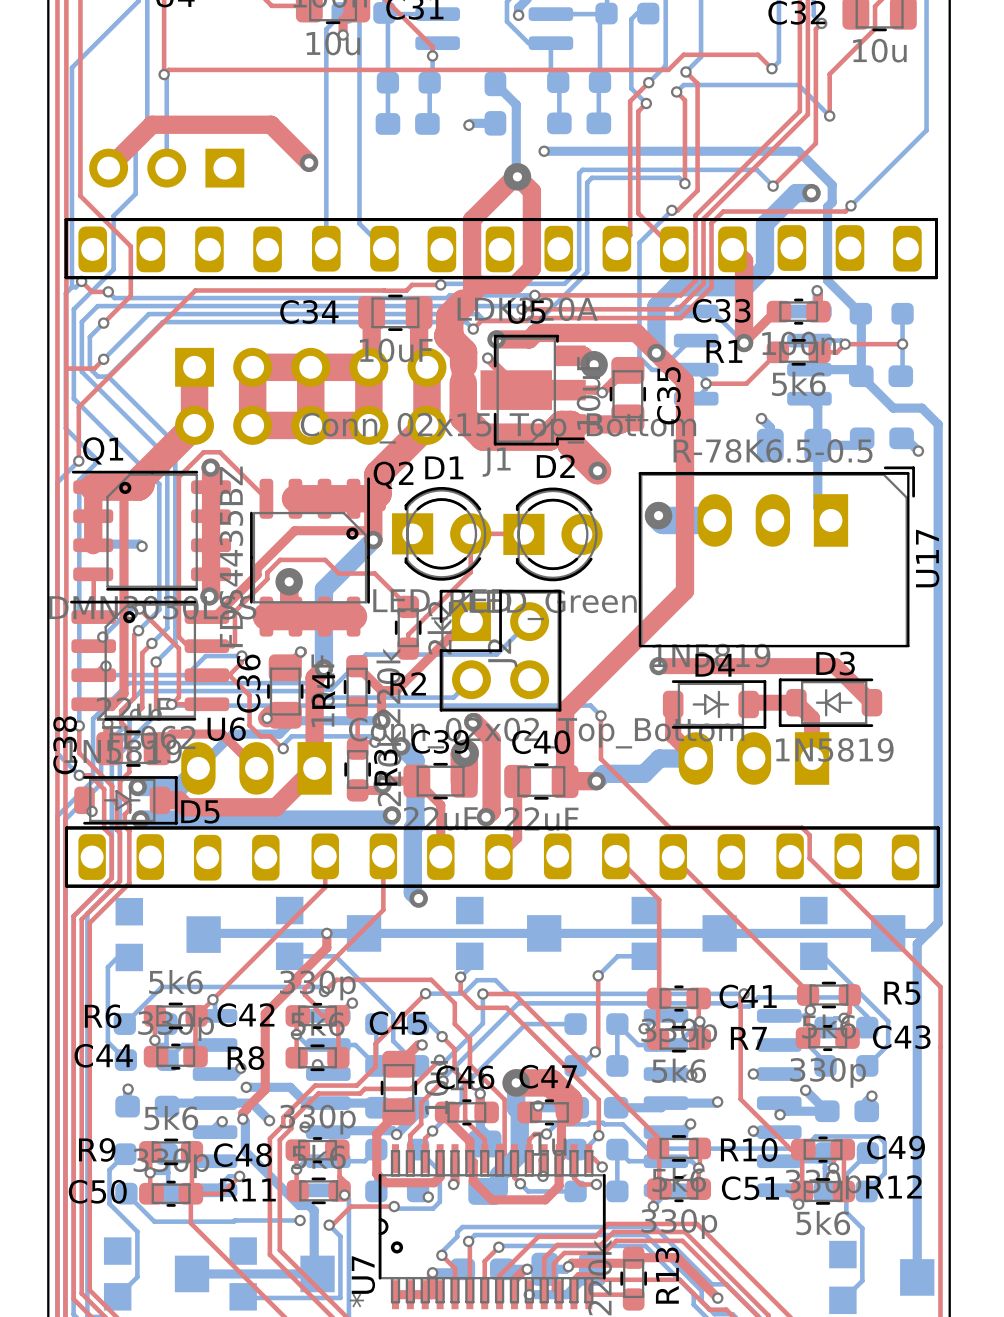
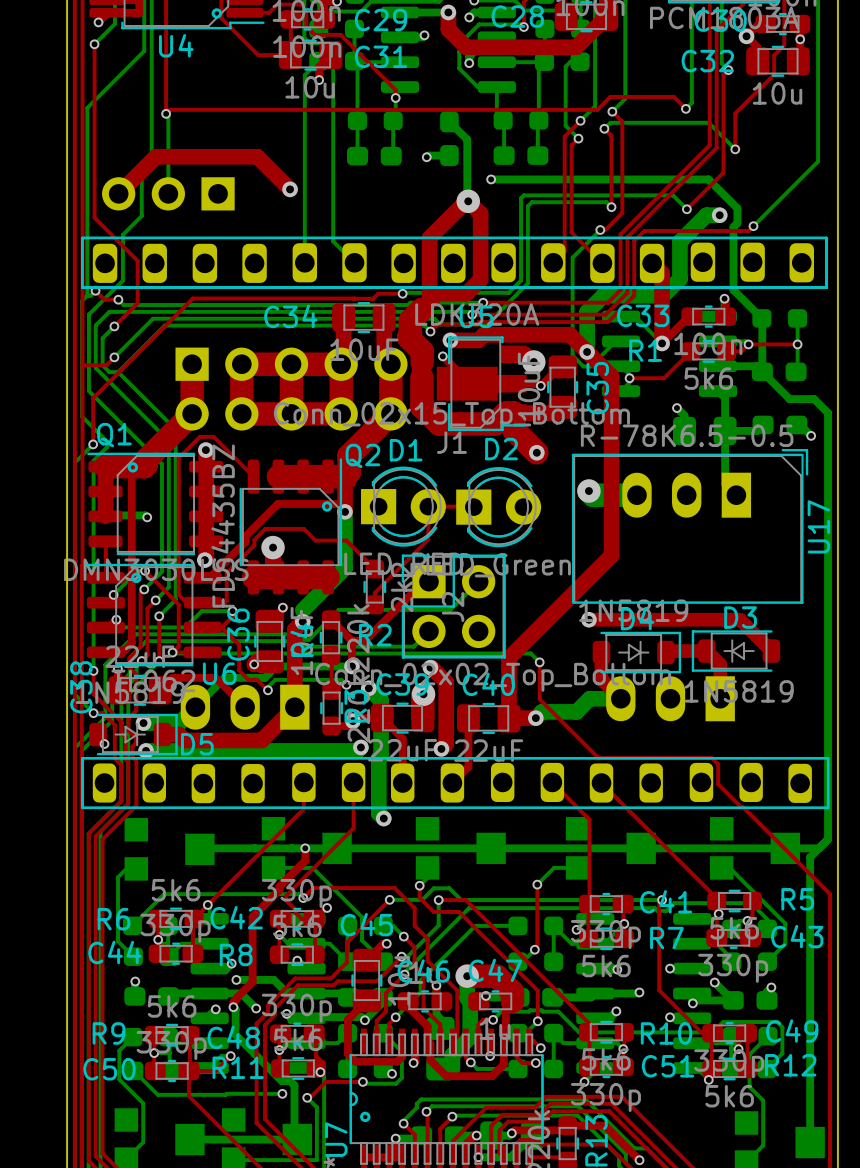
bottom track: (373, 540) (323, 589) (323, 668) -> (345, 511) (345, 568) (302, 610)

